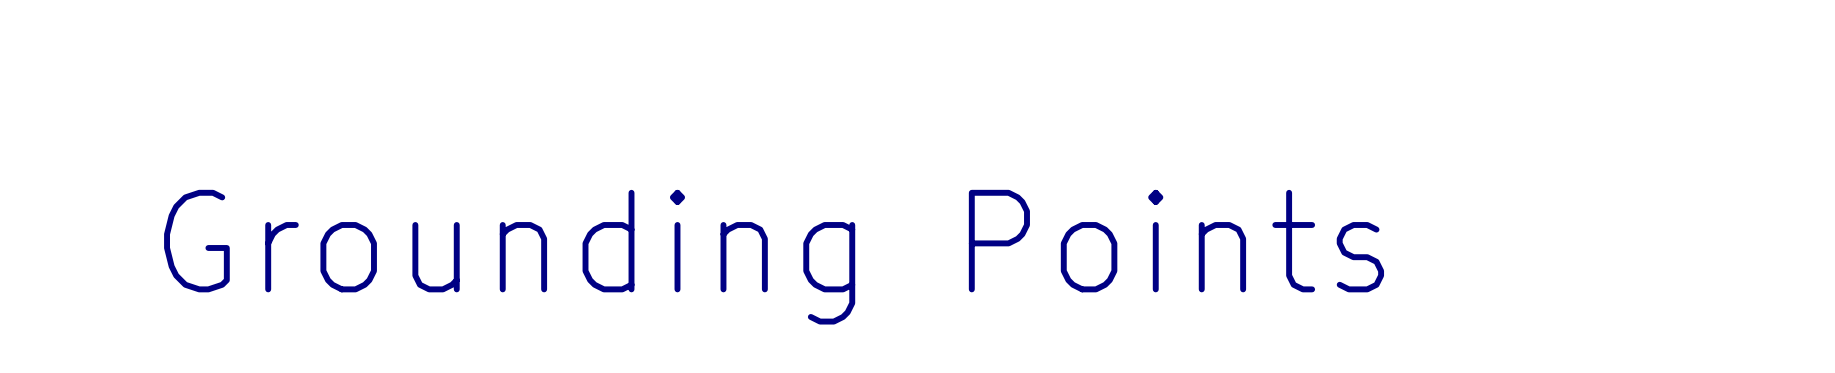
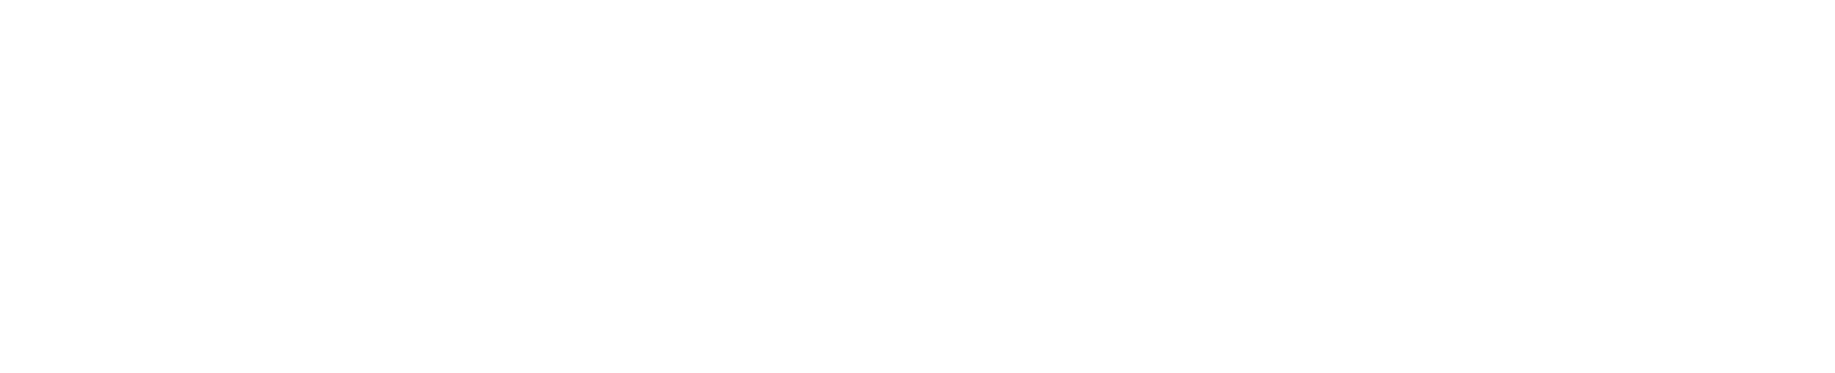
text: Grounding Points (774, 257) -> none

